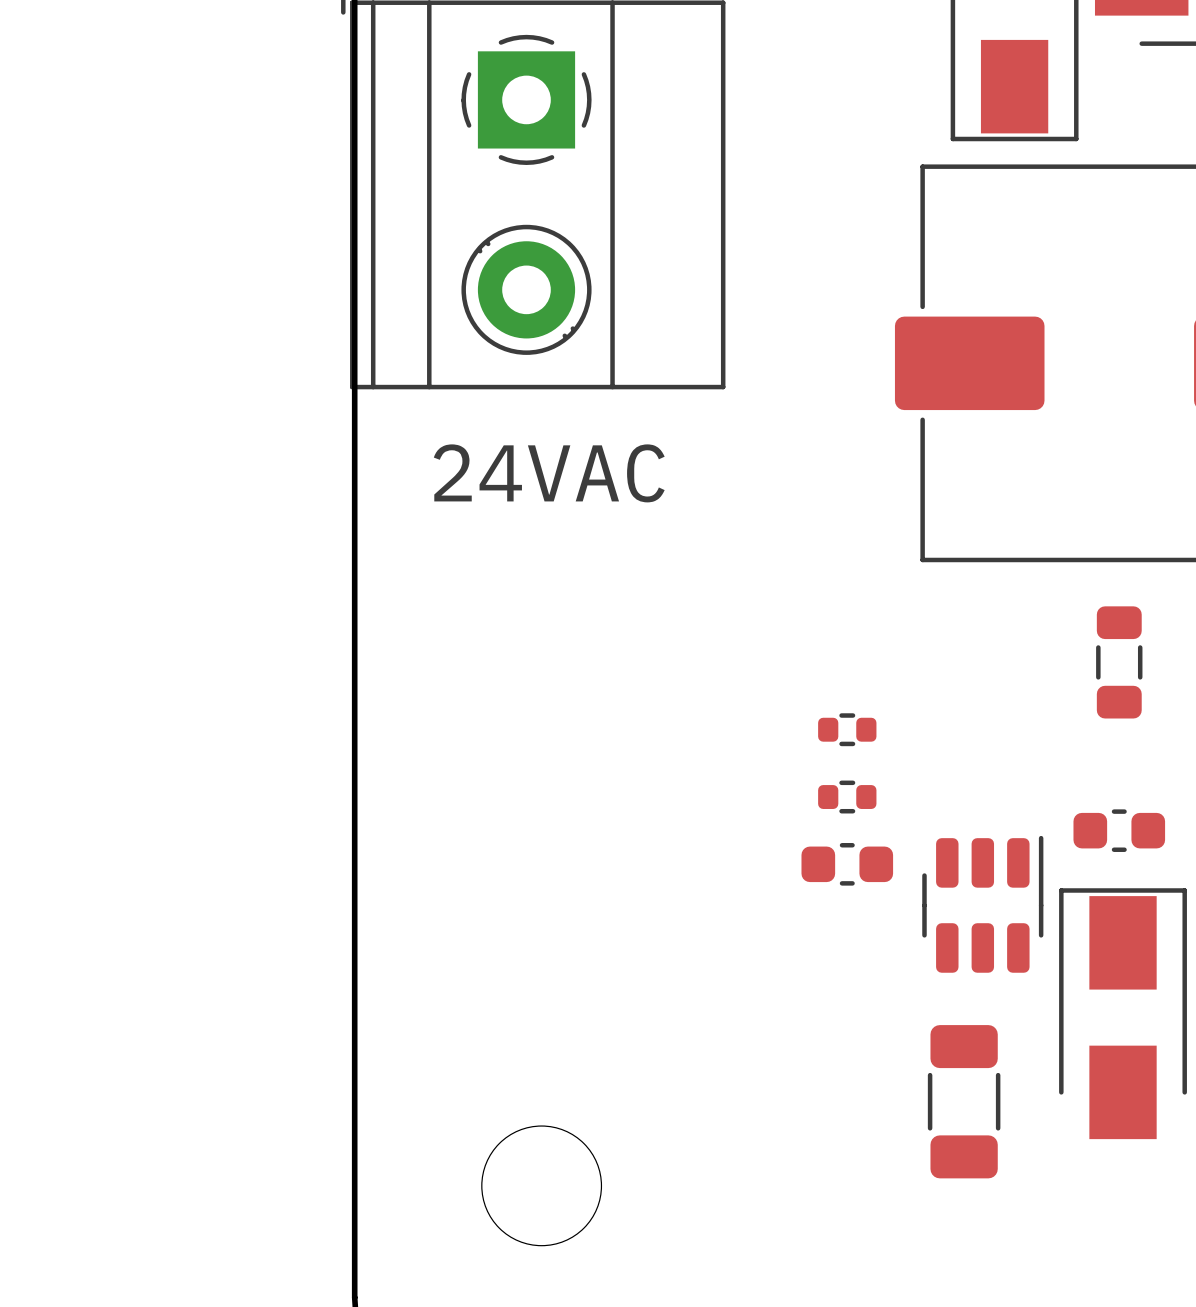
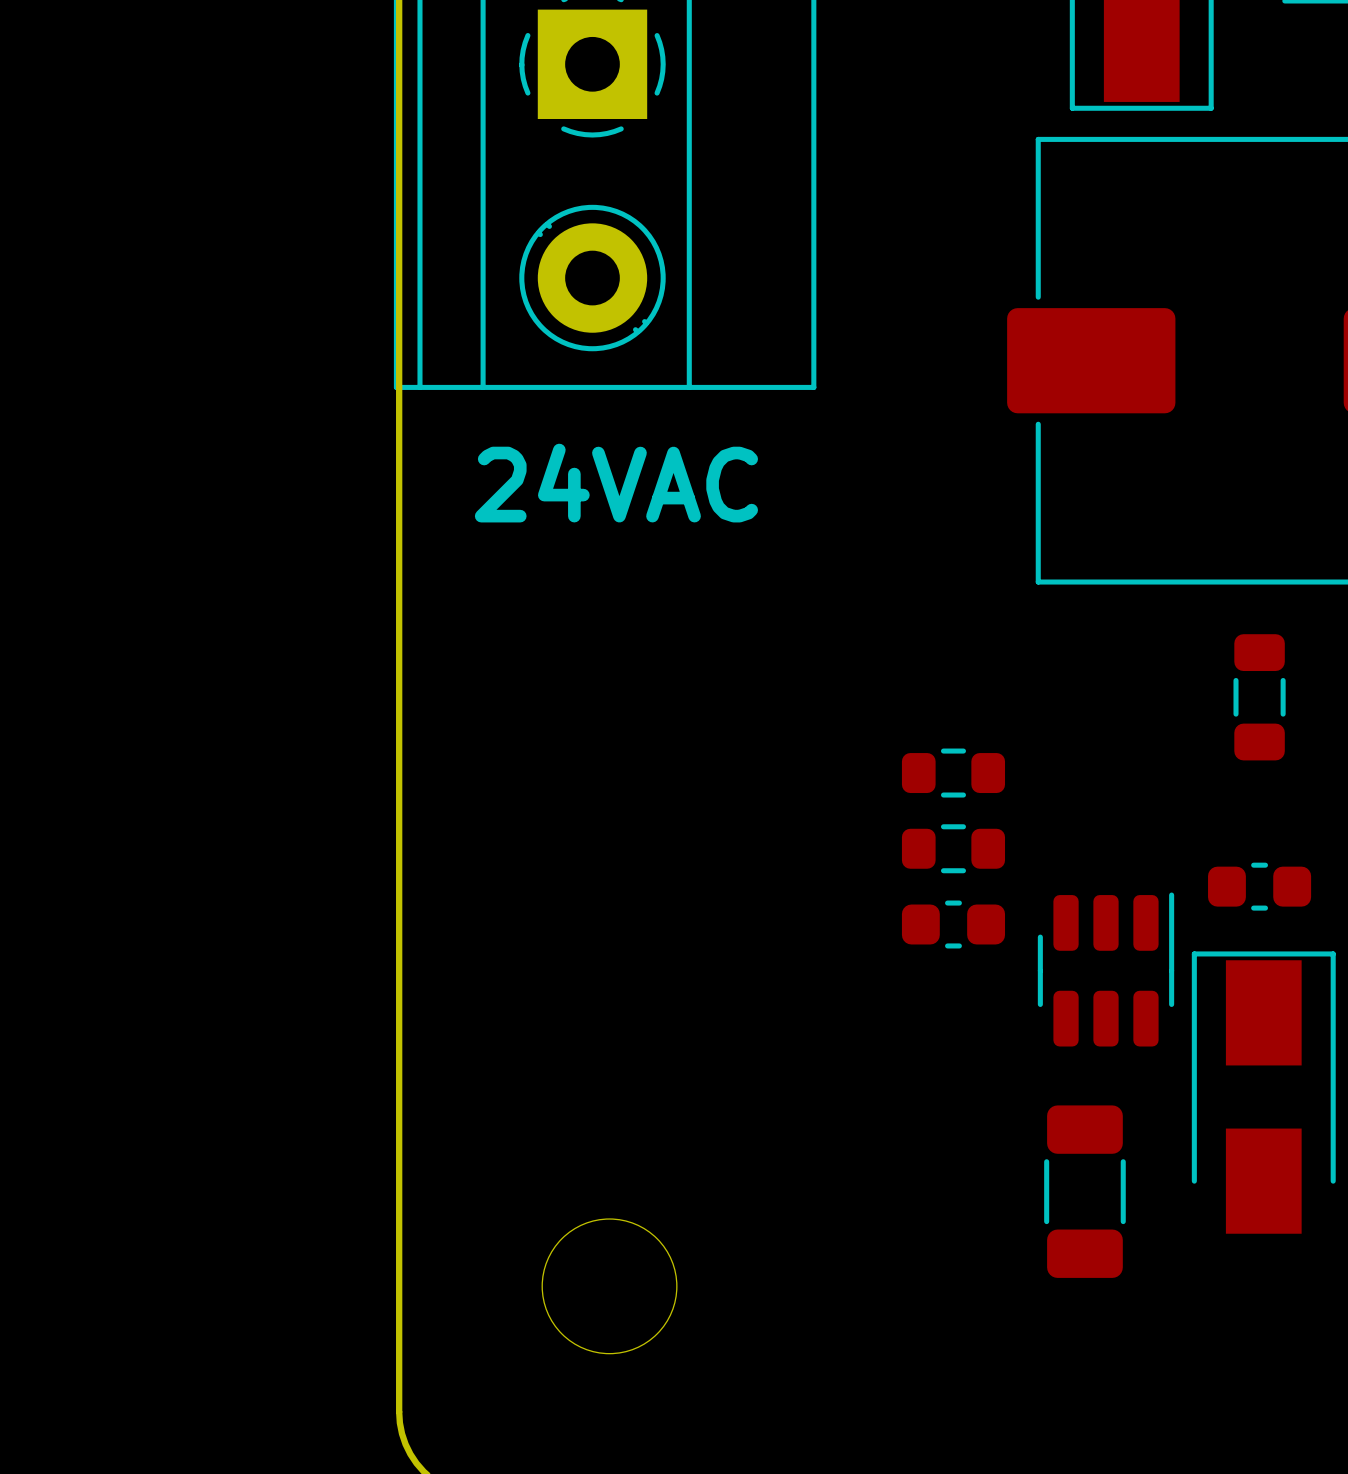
part footprint: [818, 713, 877, 747] -> [901, 748, 1006, 798]
part footprint: [818, 780, 877, 814] -> [901, 824, 1006, 874]

